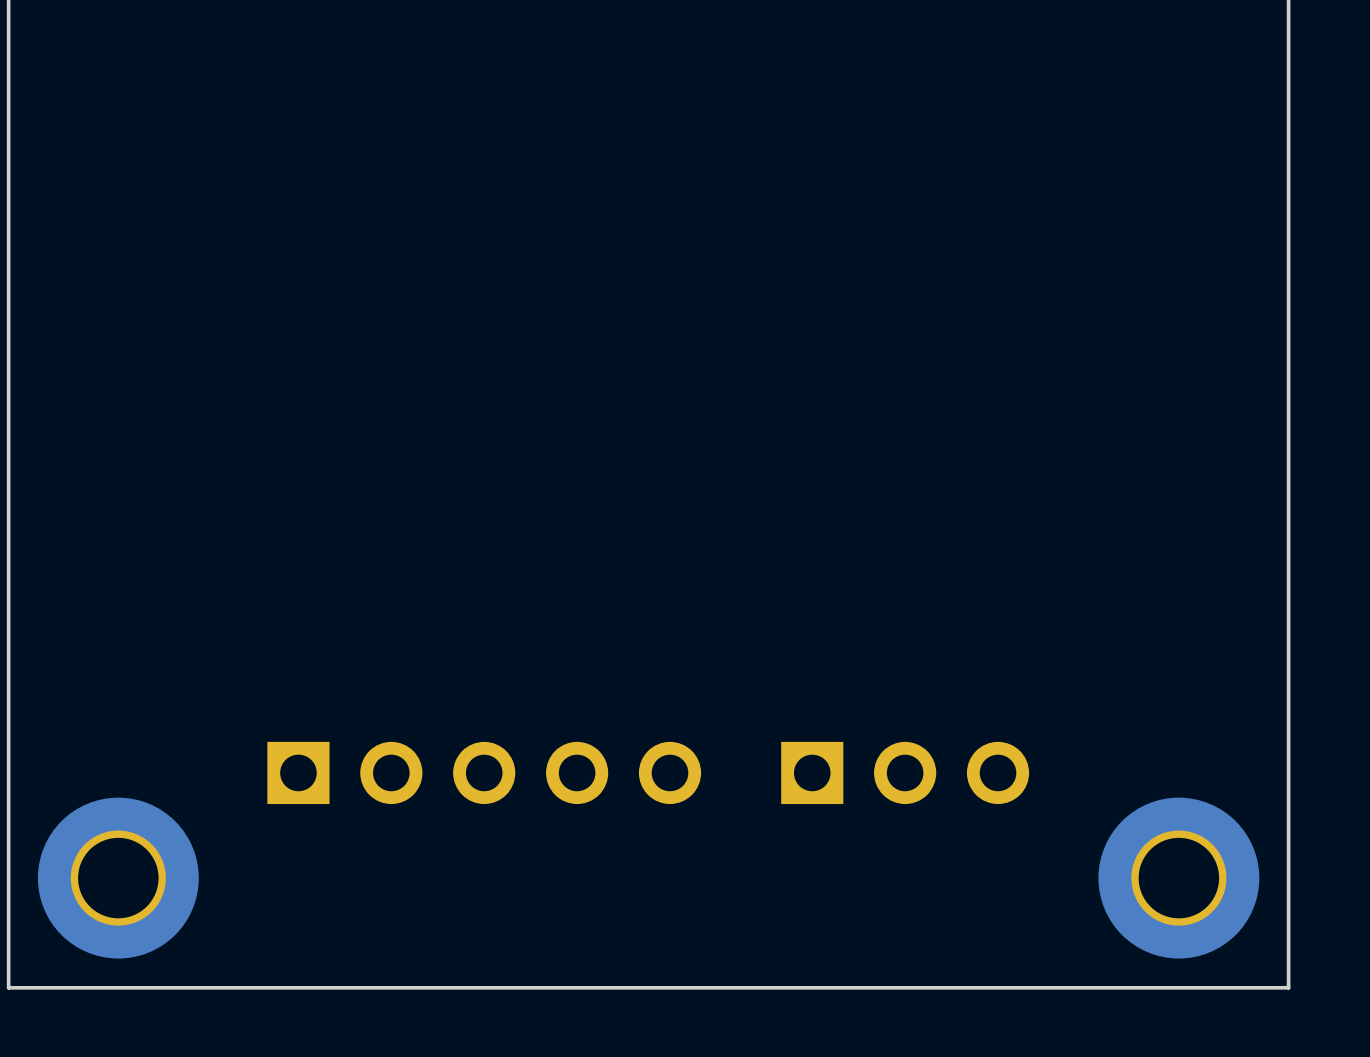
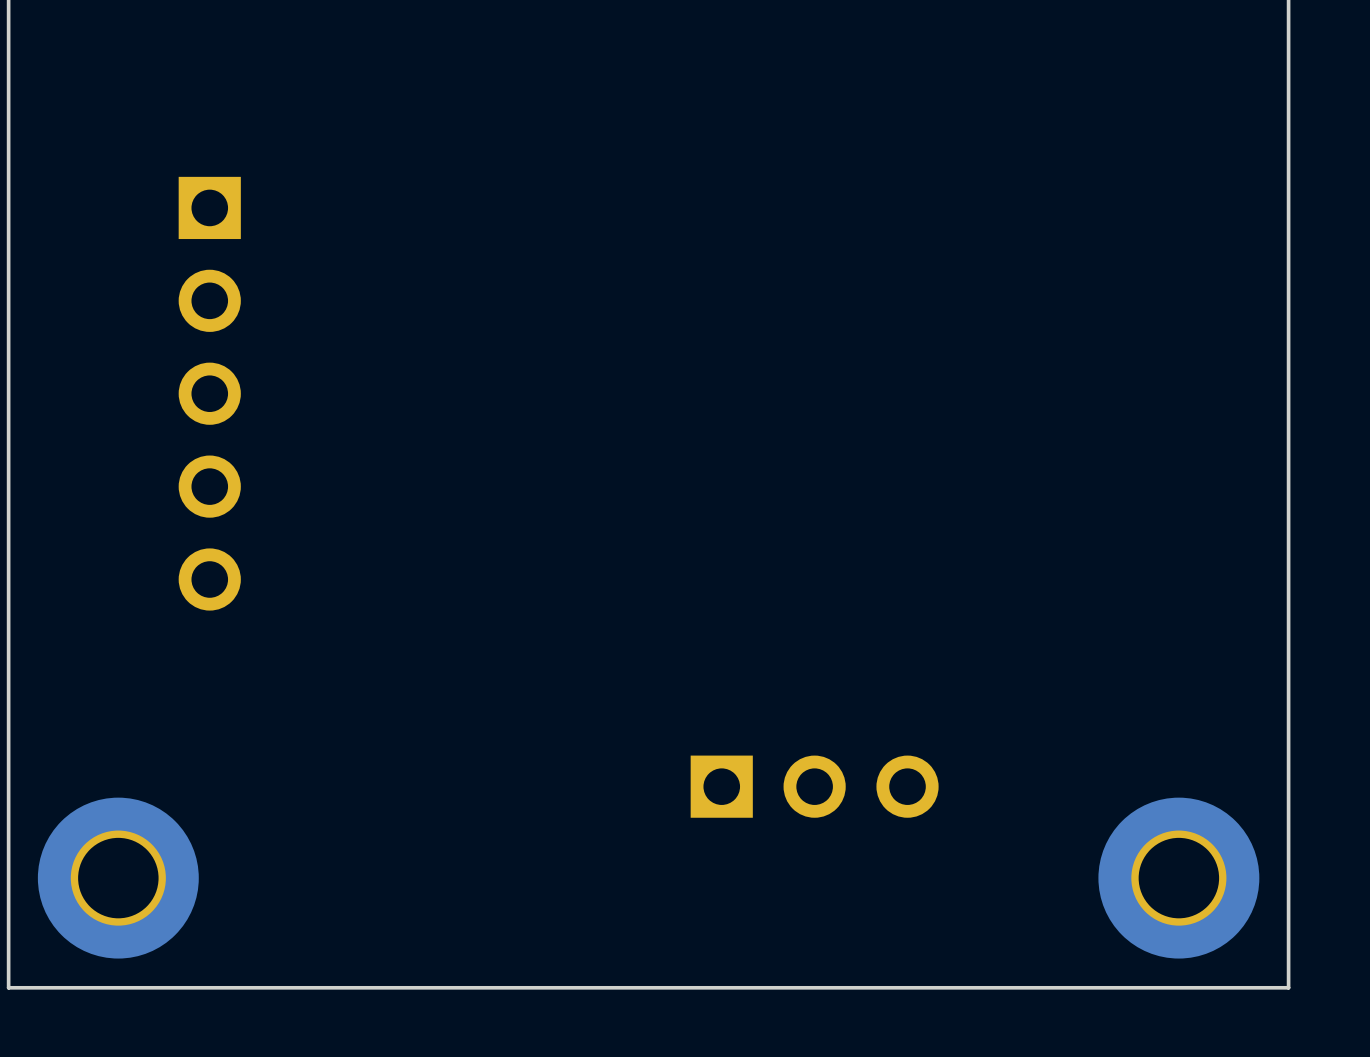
part rotation: 0° (484, 772) -> 90° clockwise (209, 393)
part position: (484, 772) -> (209, 393)
part position: (905, 772) -> (814, 786)

